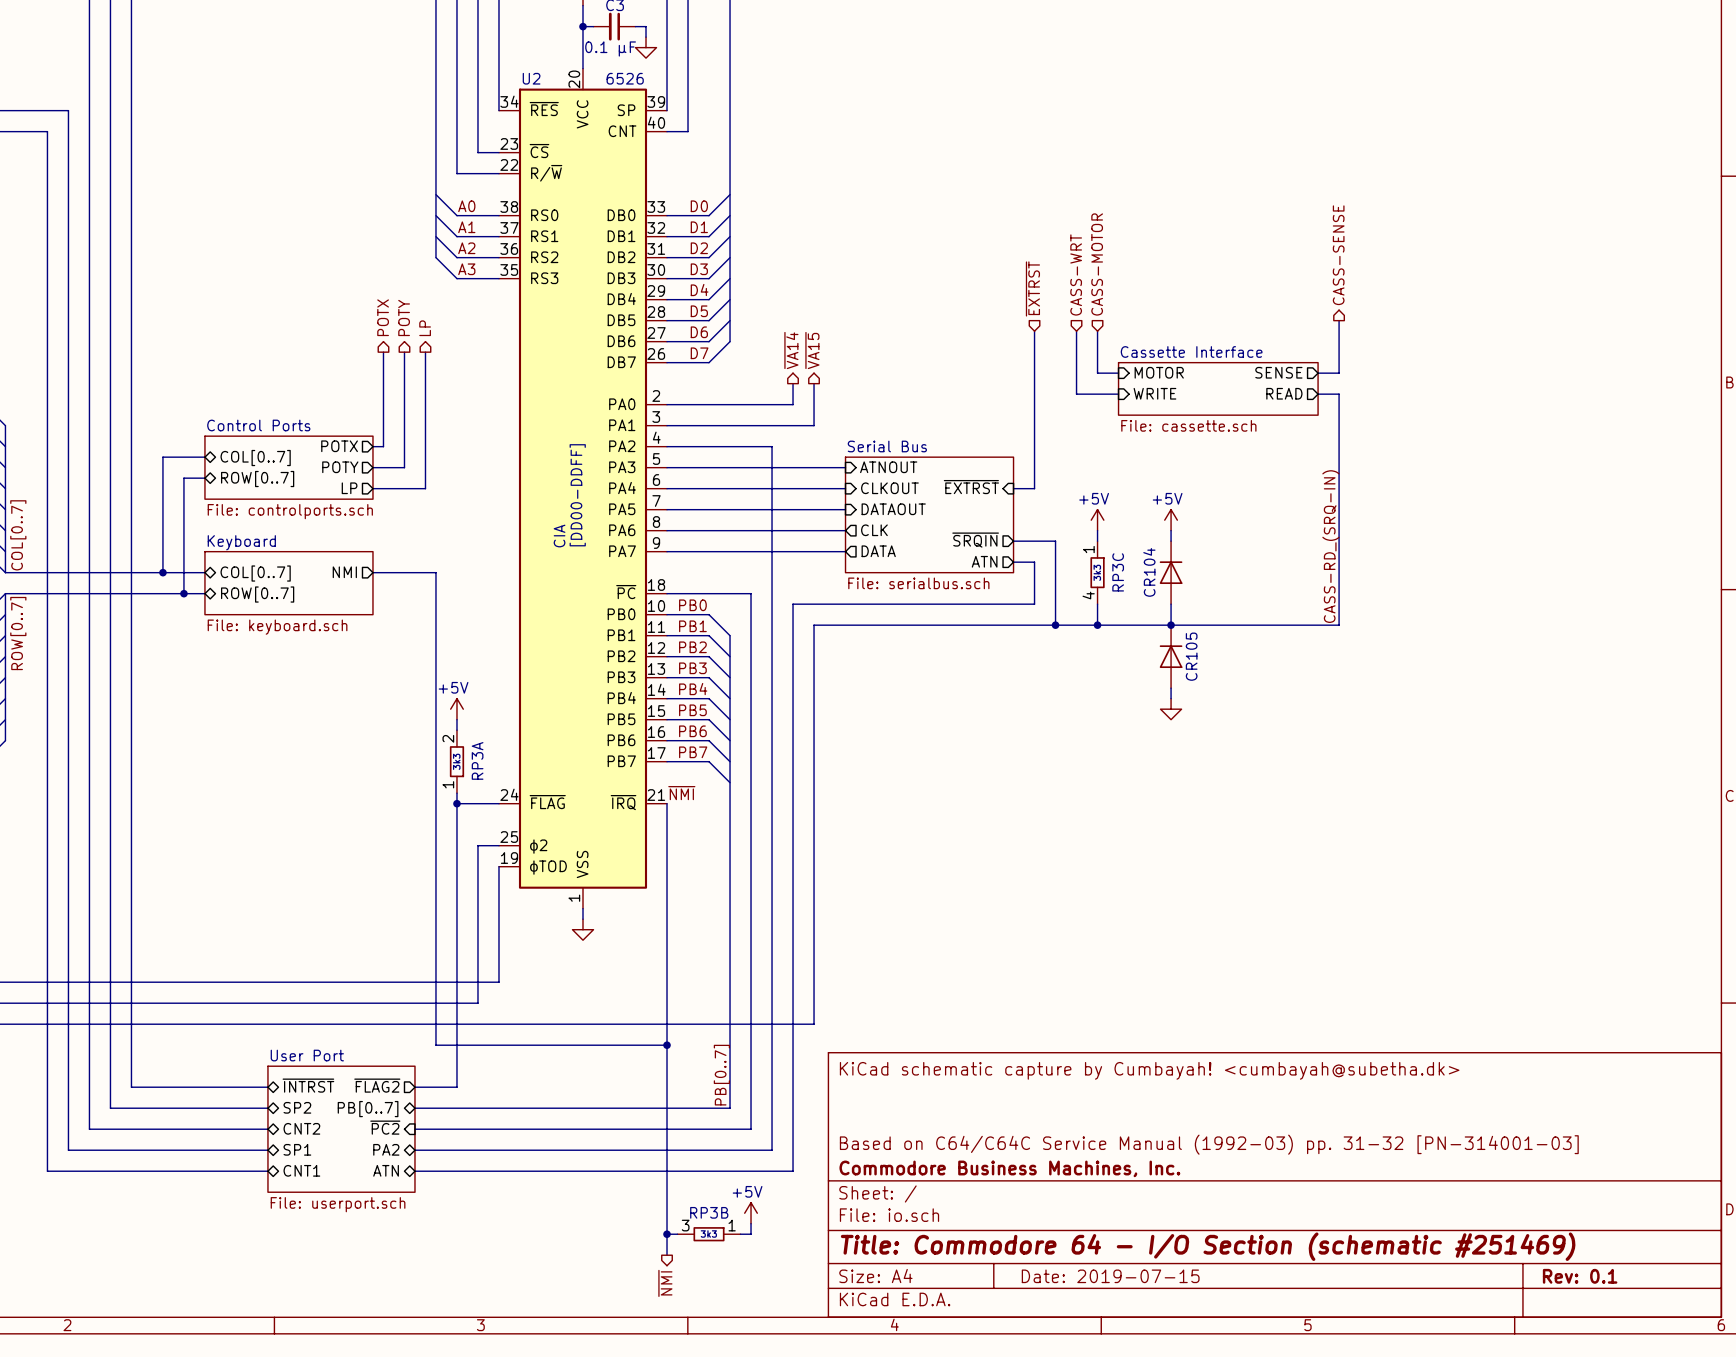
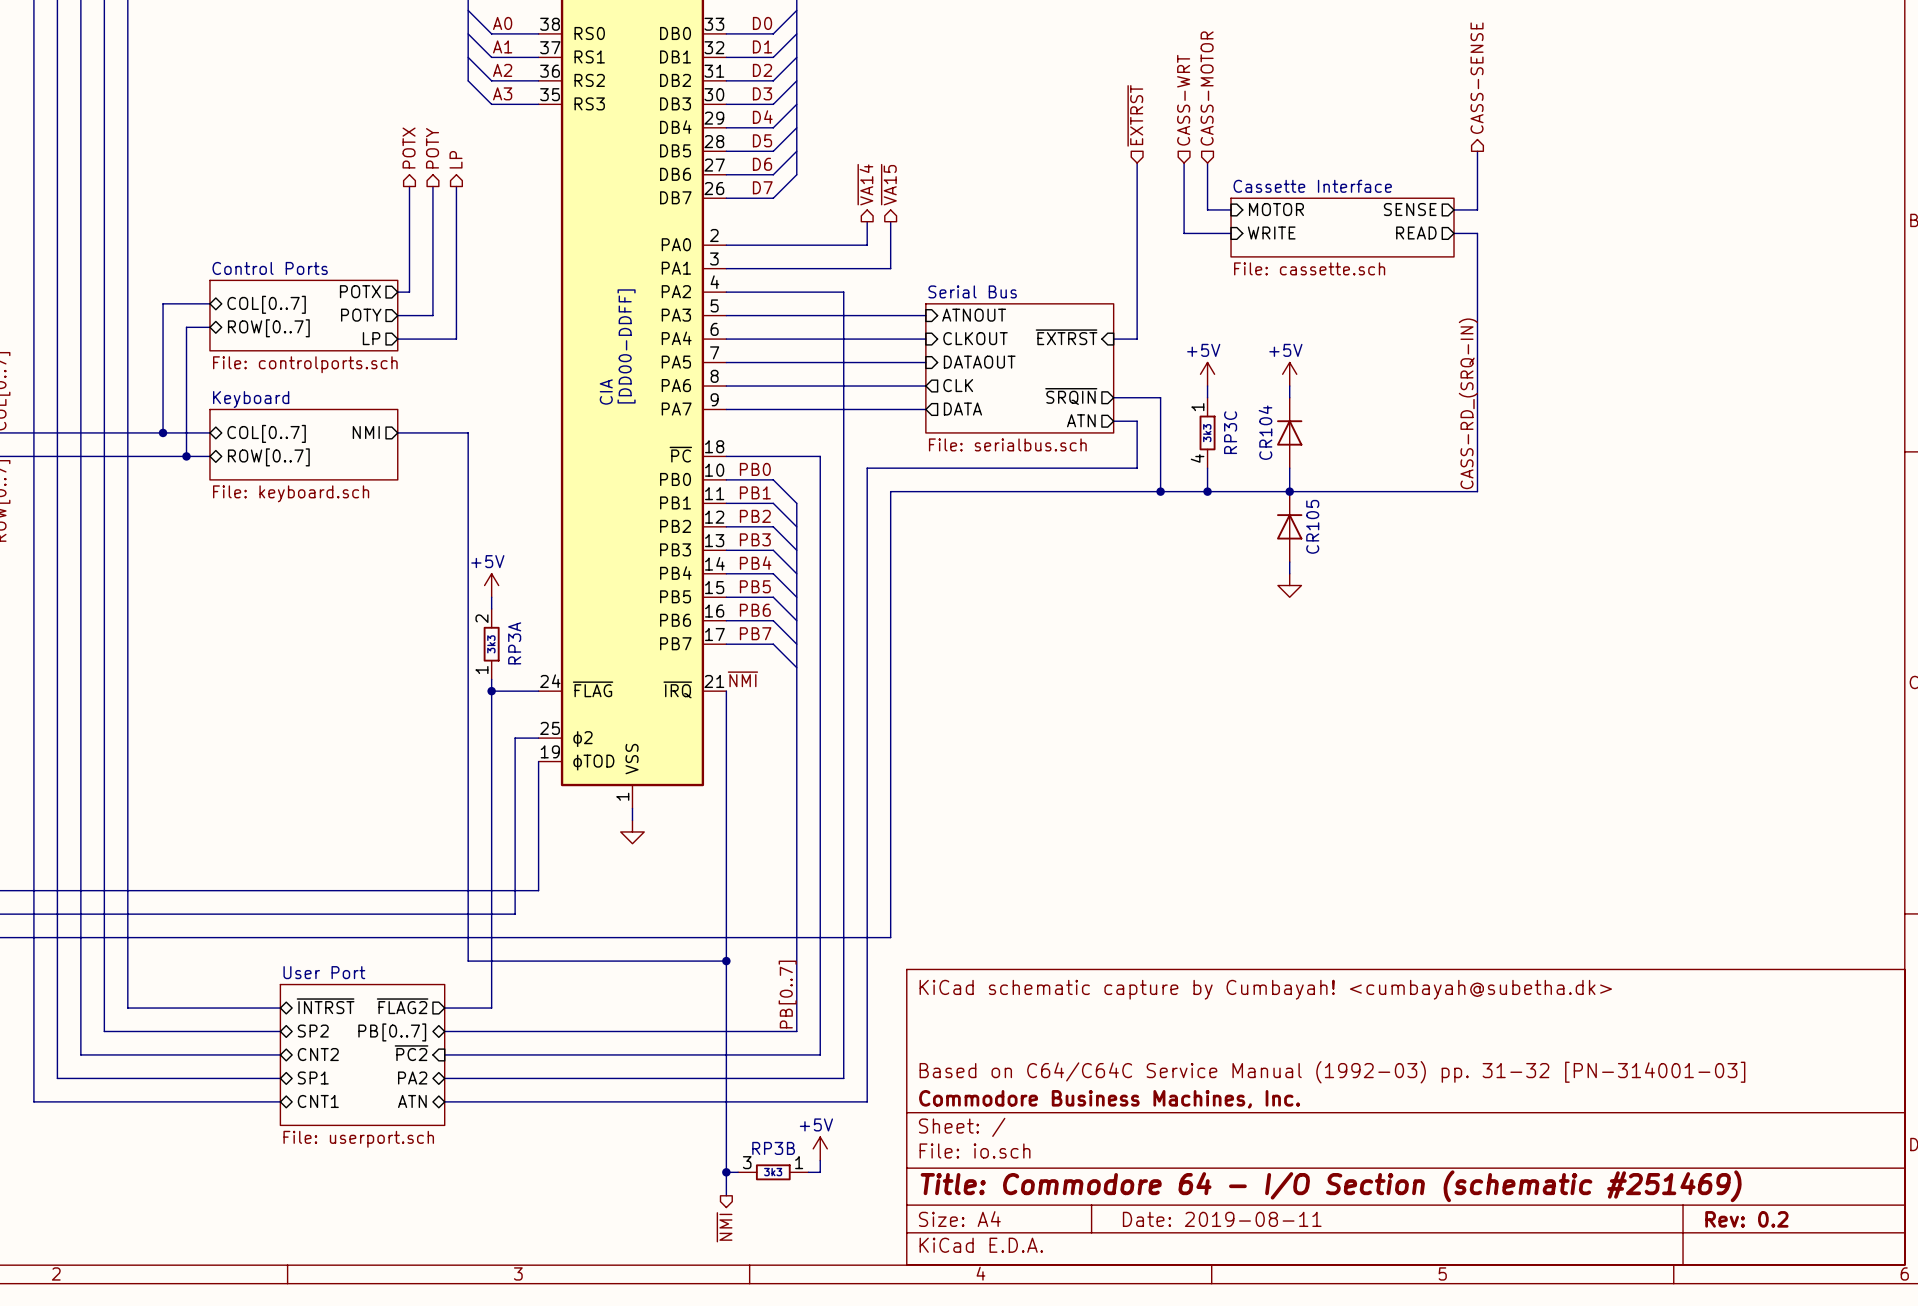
title block: Date: 2019-07-15 (1110, 1276) -> Date: 2019-08-11 (1222, 1219)
title block: Rev: 0.1 (1580, 1276) -> Rev: 0.2 (1746, 1219)

